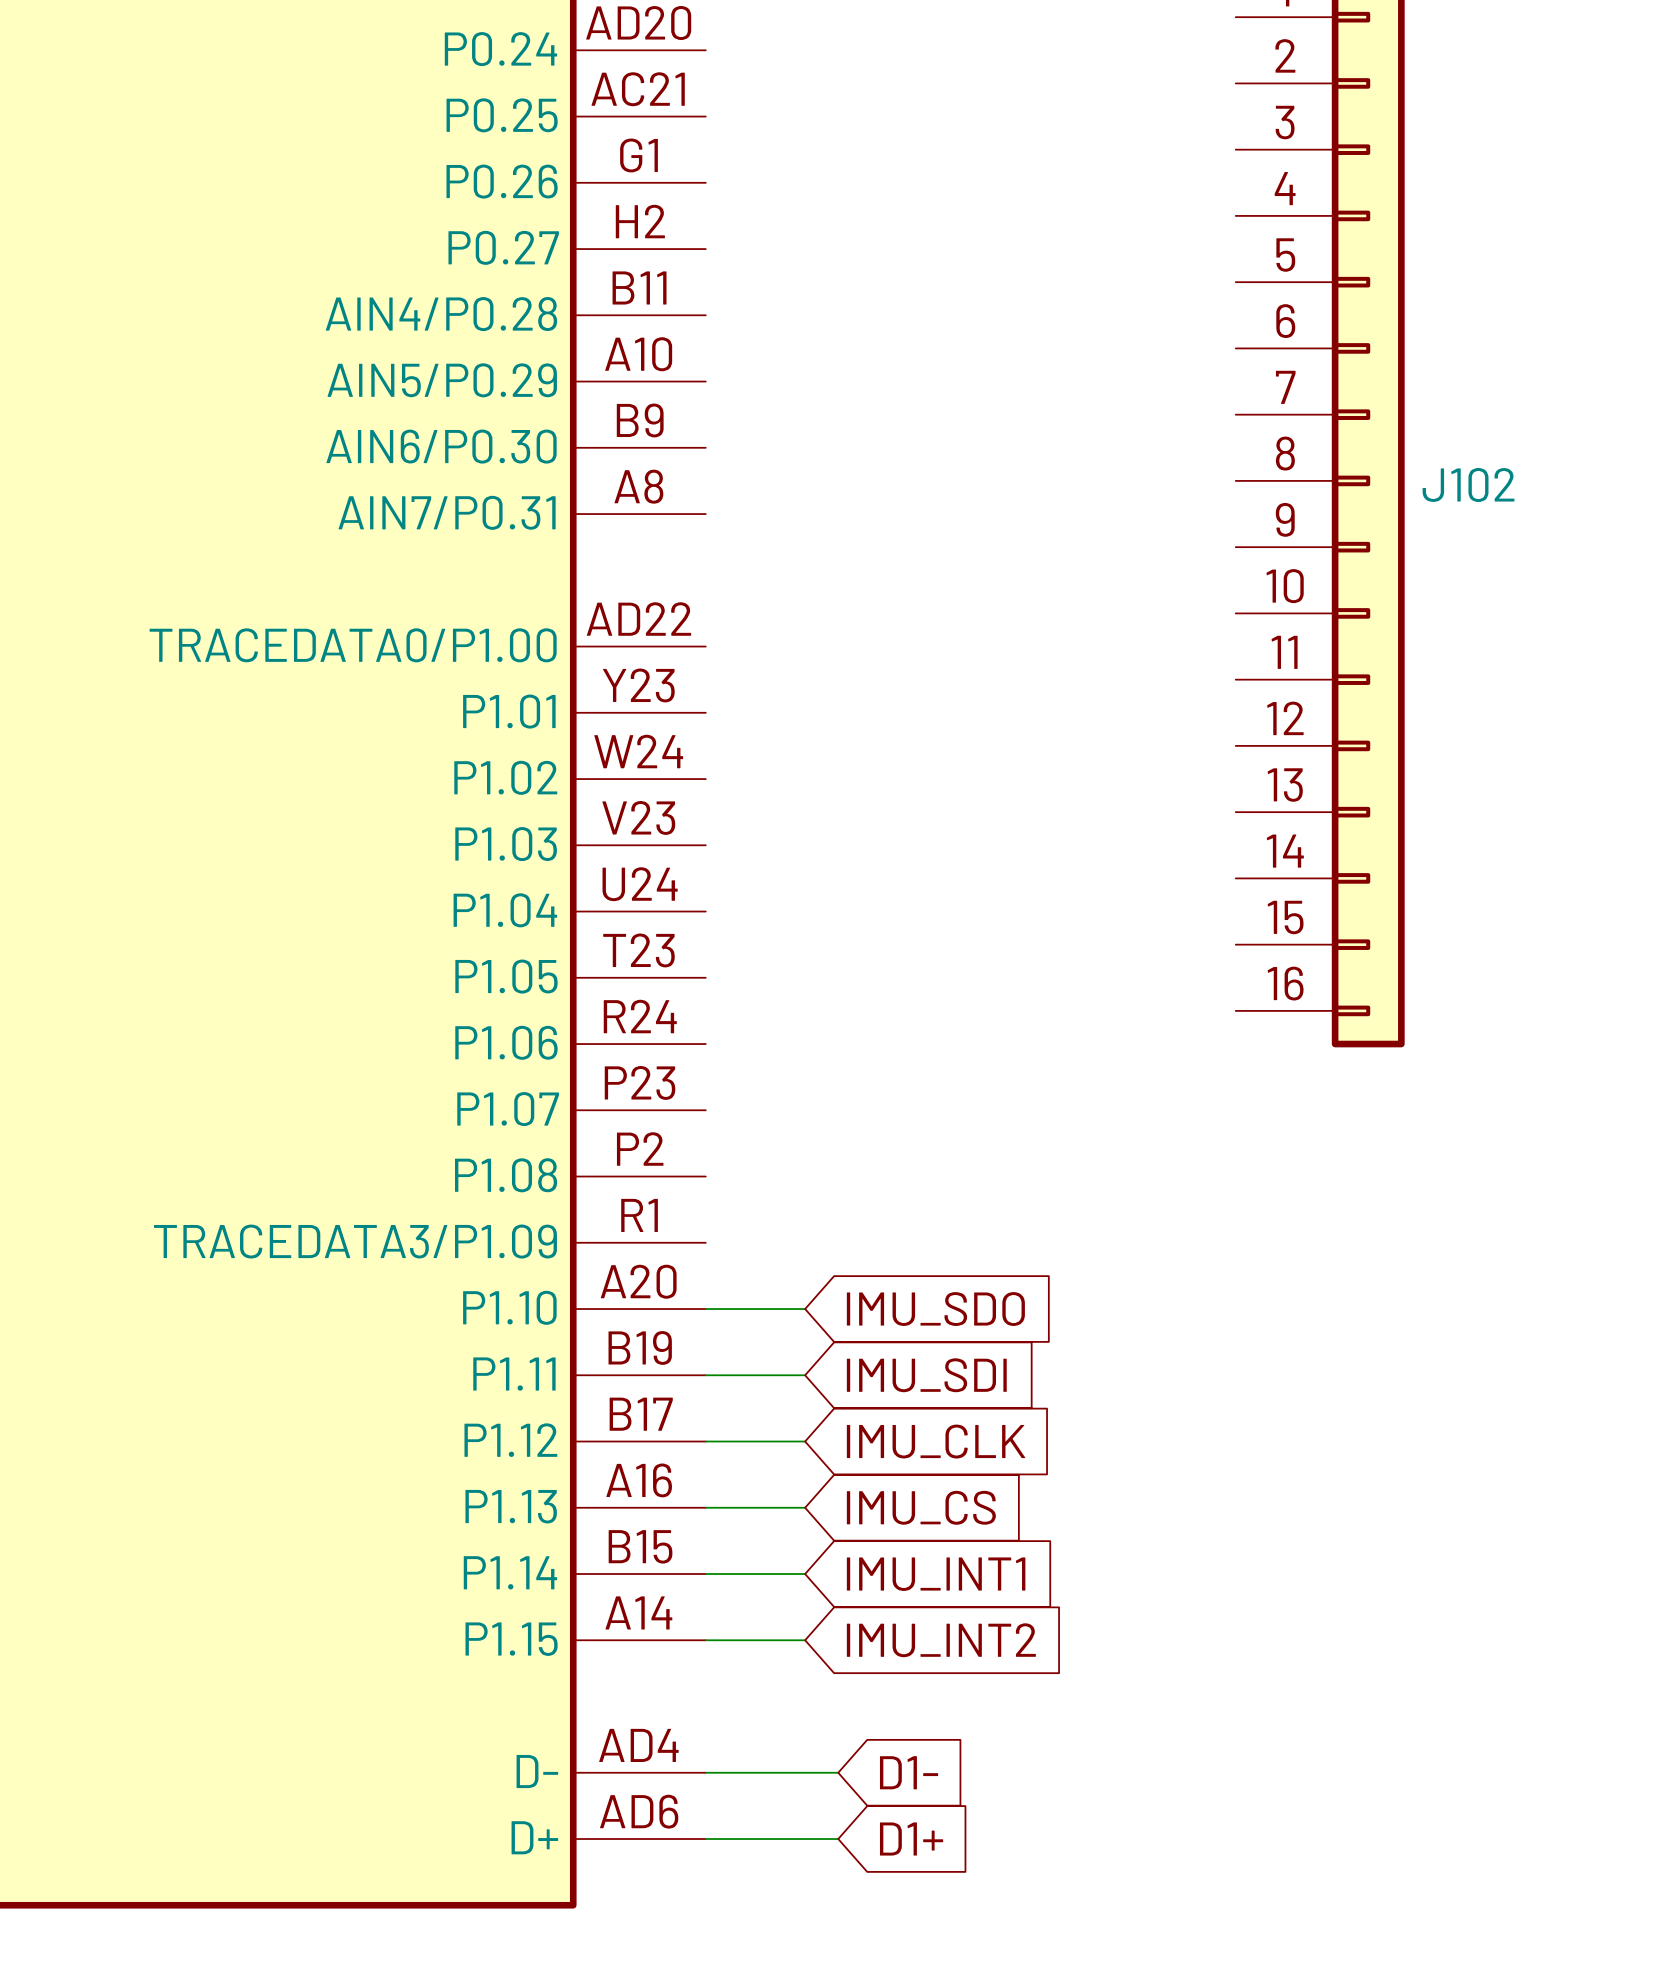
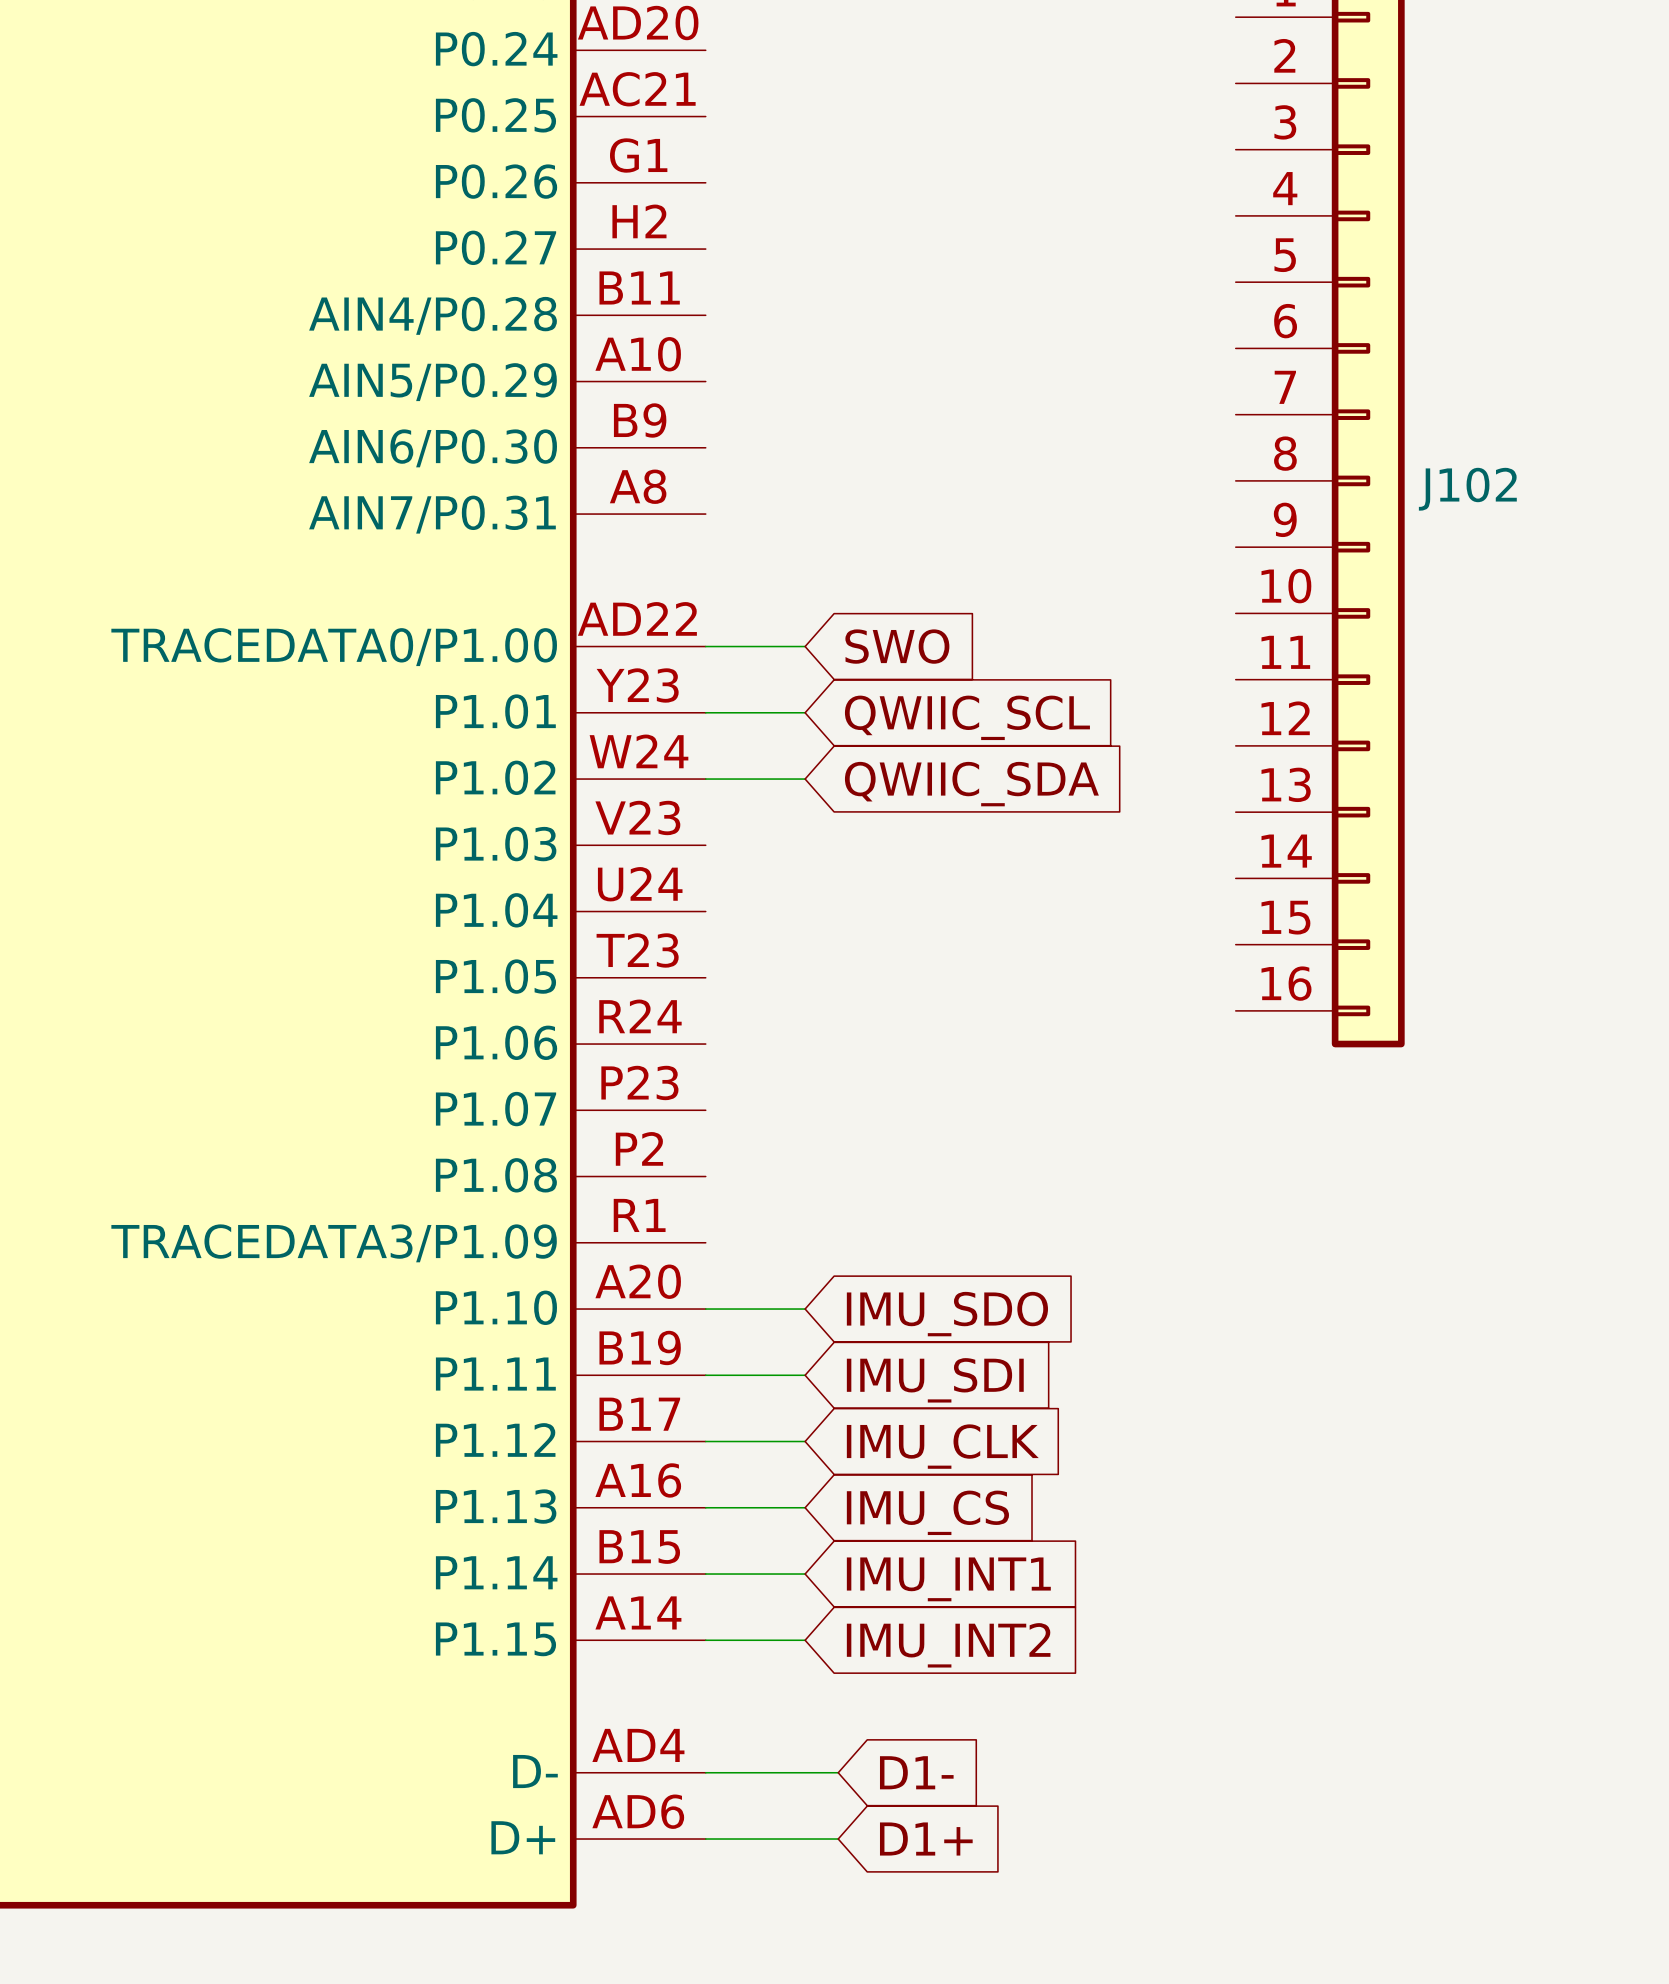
wire: none -> (705, 646) (805, 646)
global label: none -> SWO (897, 646)
wire: none -> (705, 712) (805, 712)
global label: none -> QWIIC_SCL (967, 717)
wire: none -> (705, 779) (805, 779)
global label: none -> QWIIC_SDA (971, 784)

